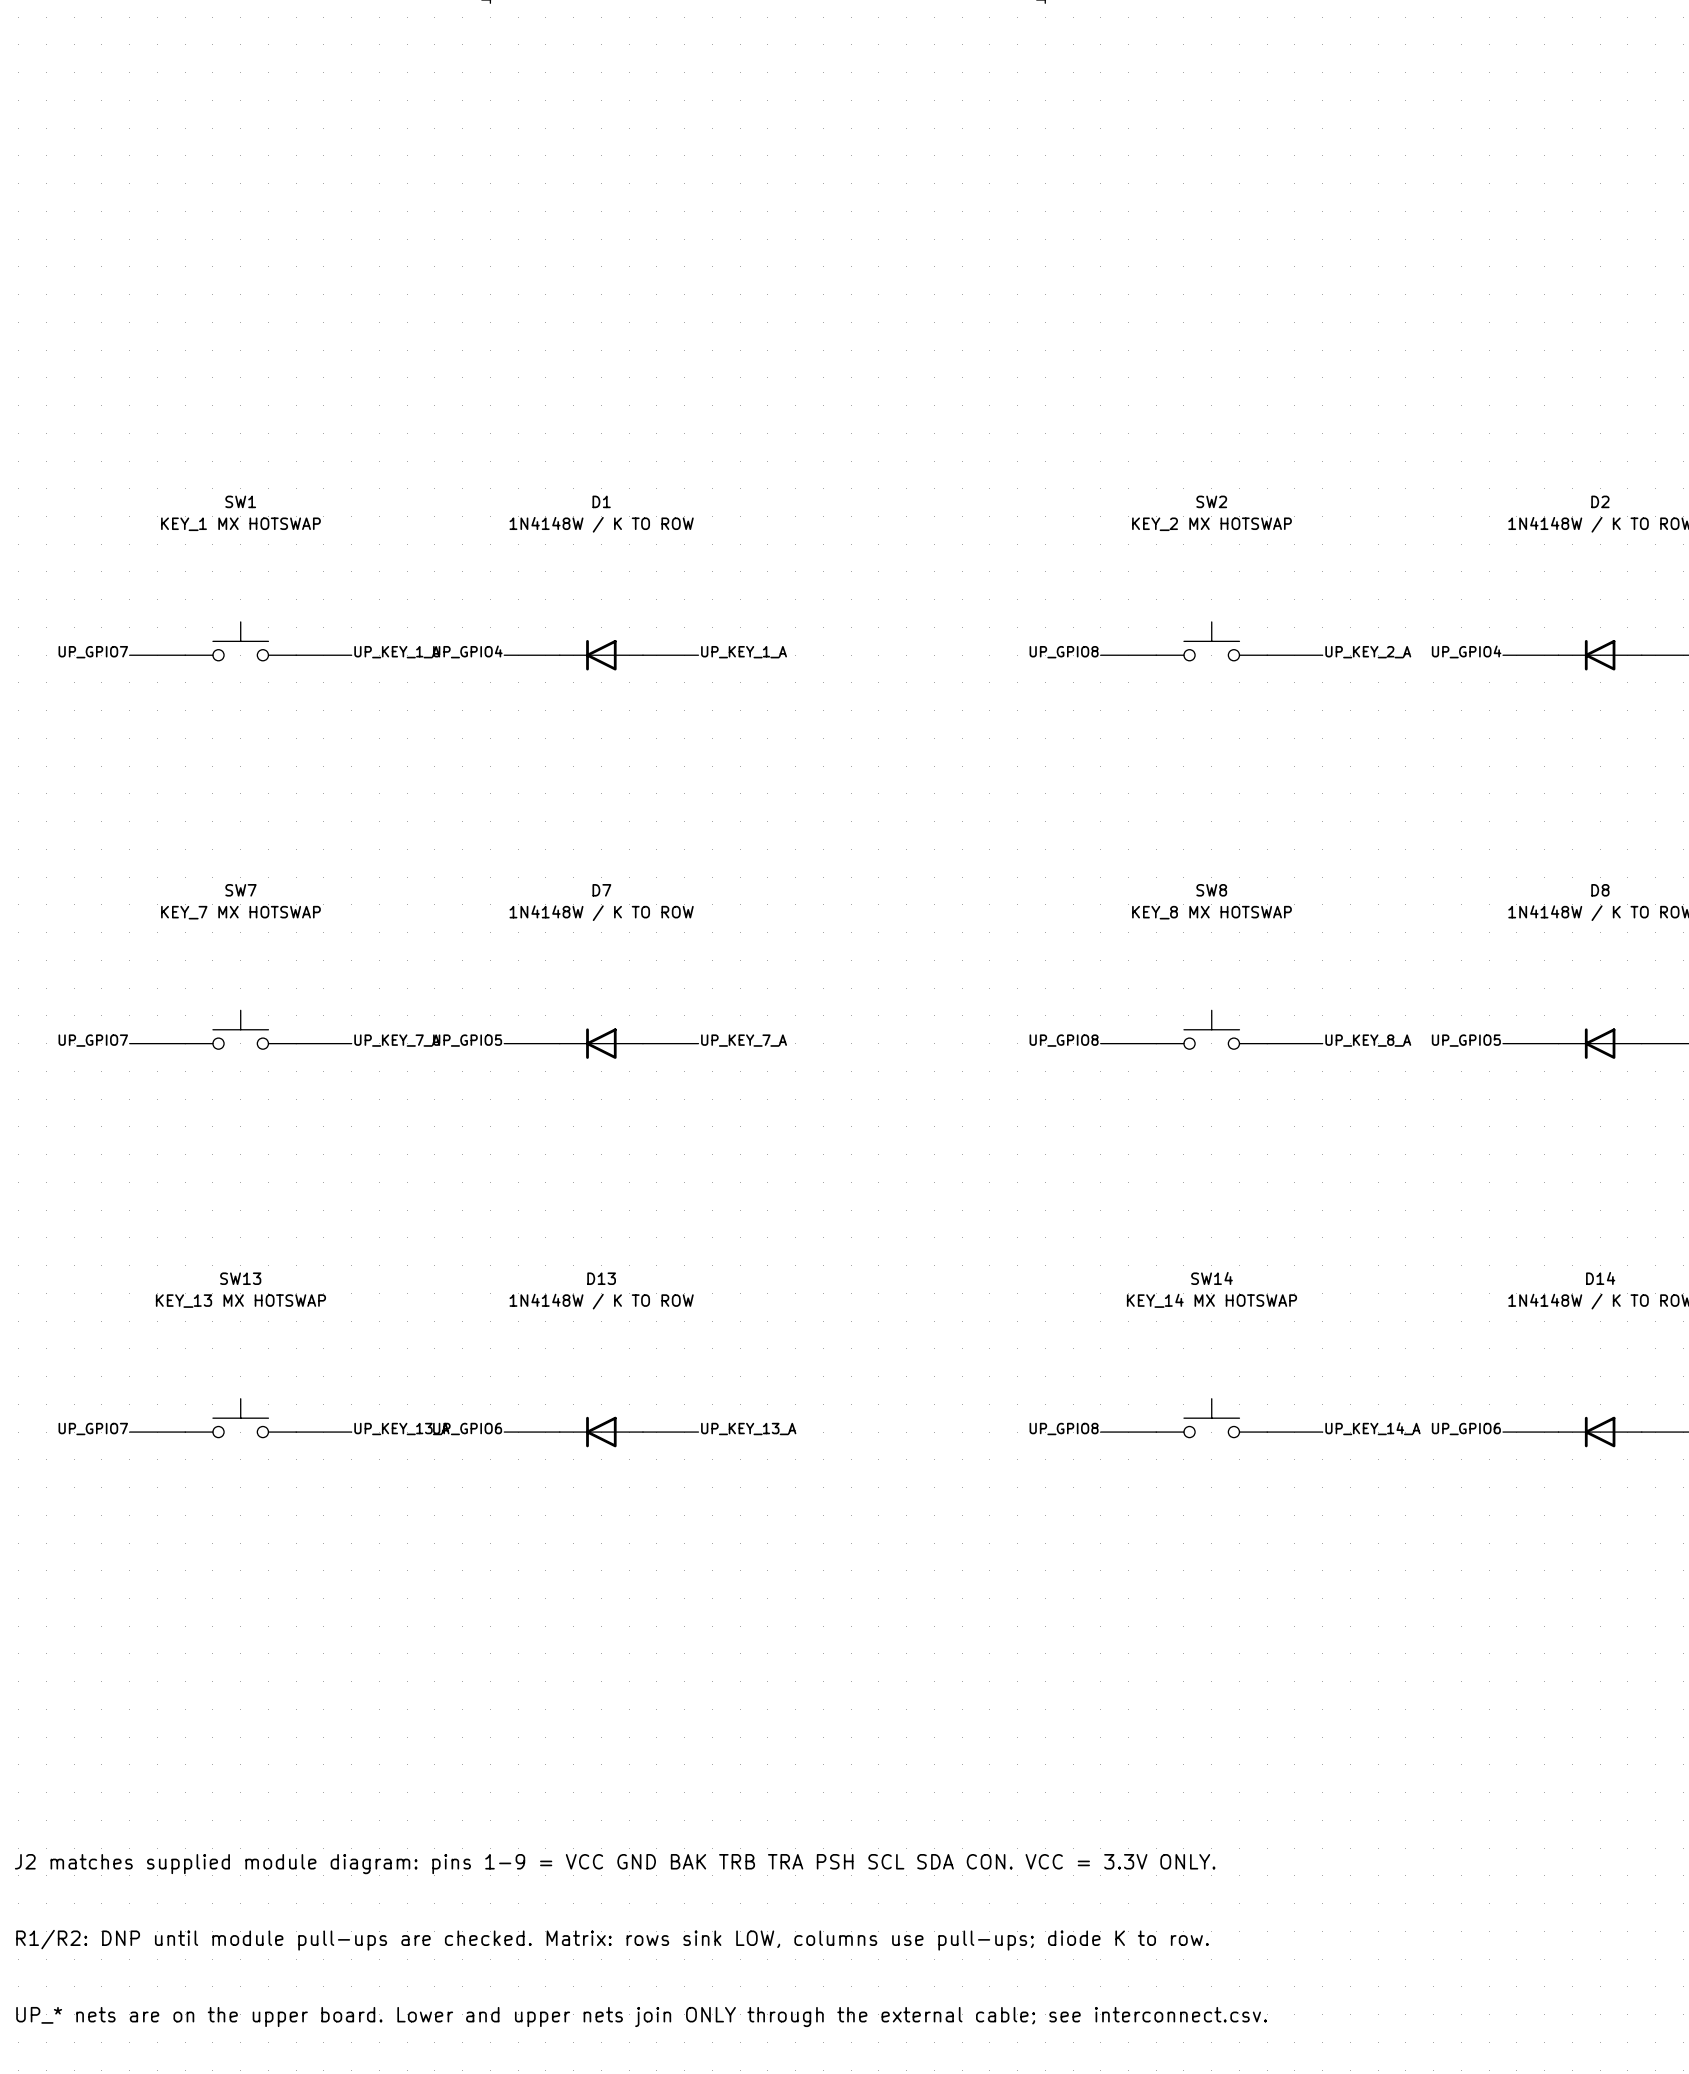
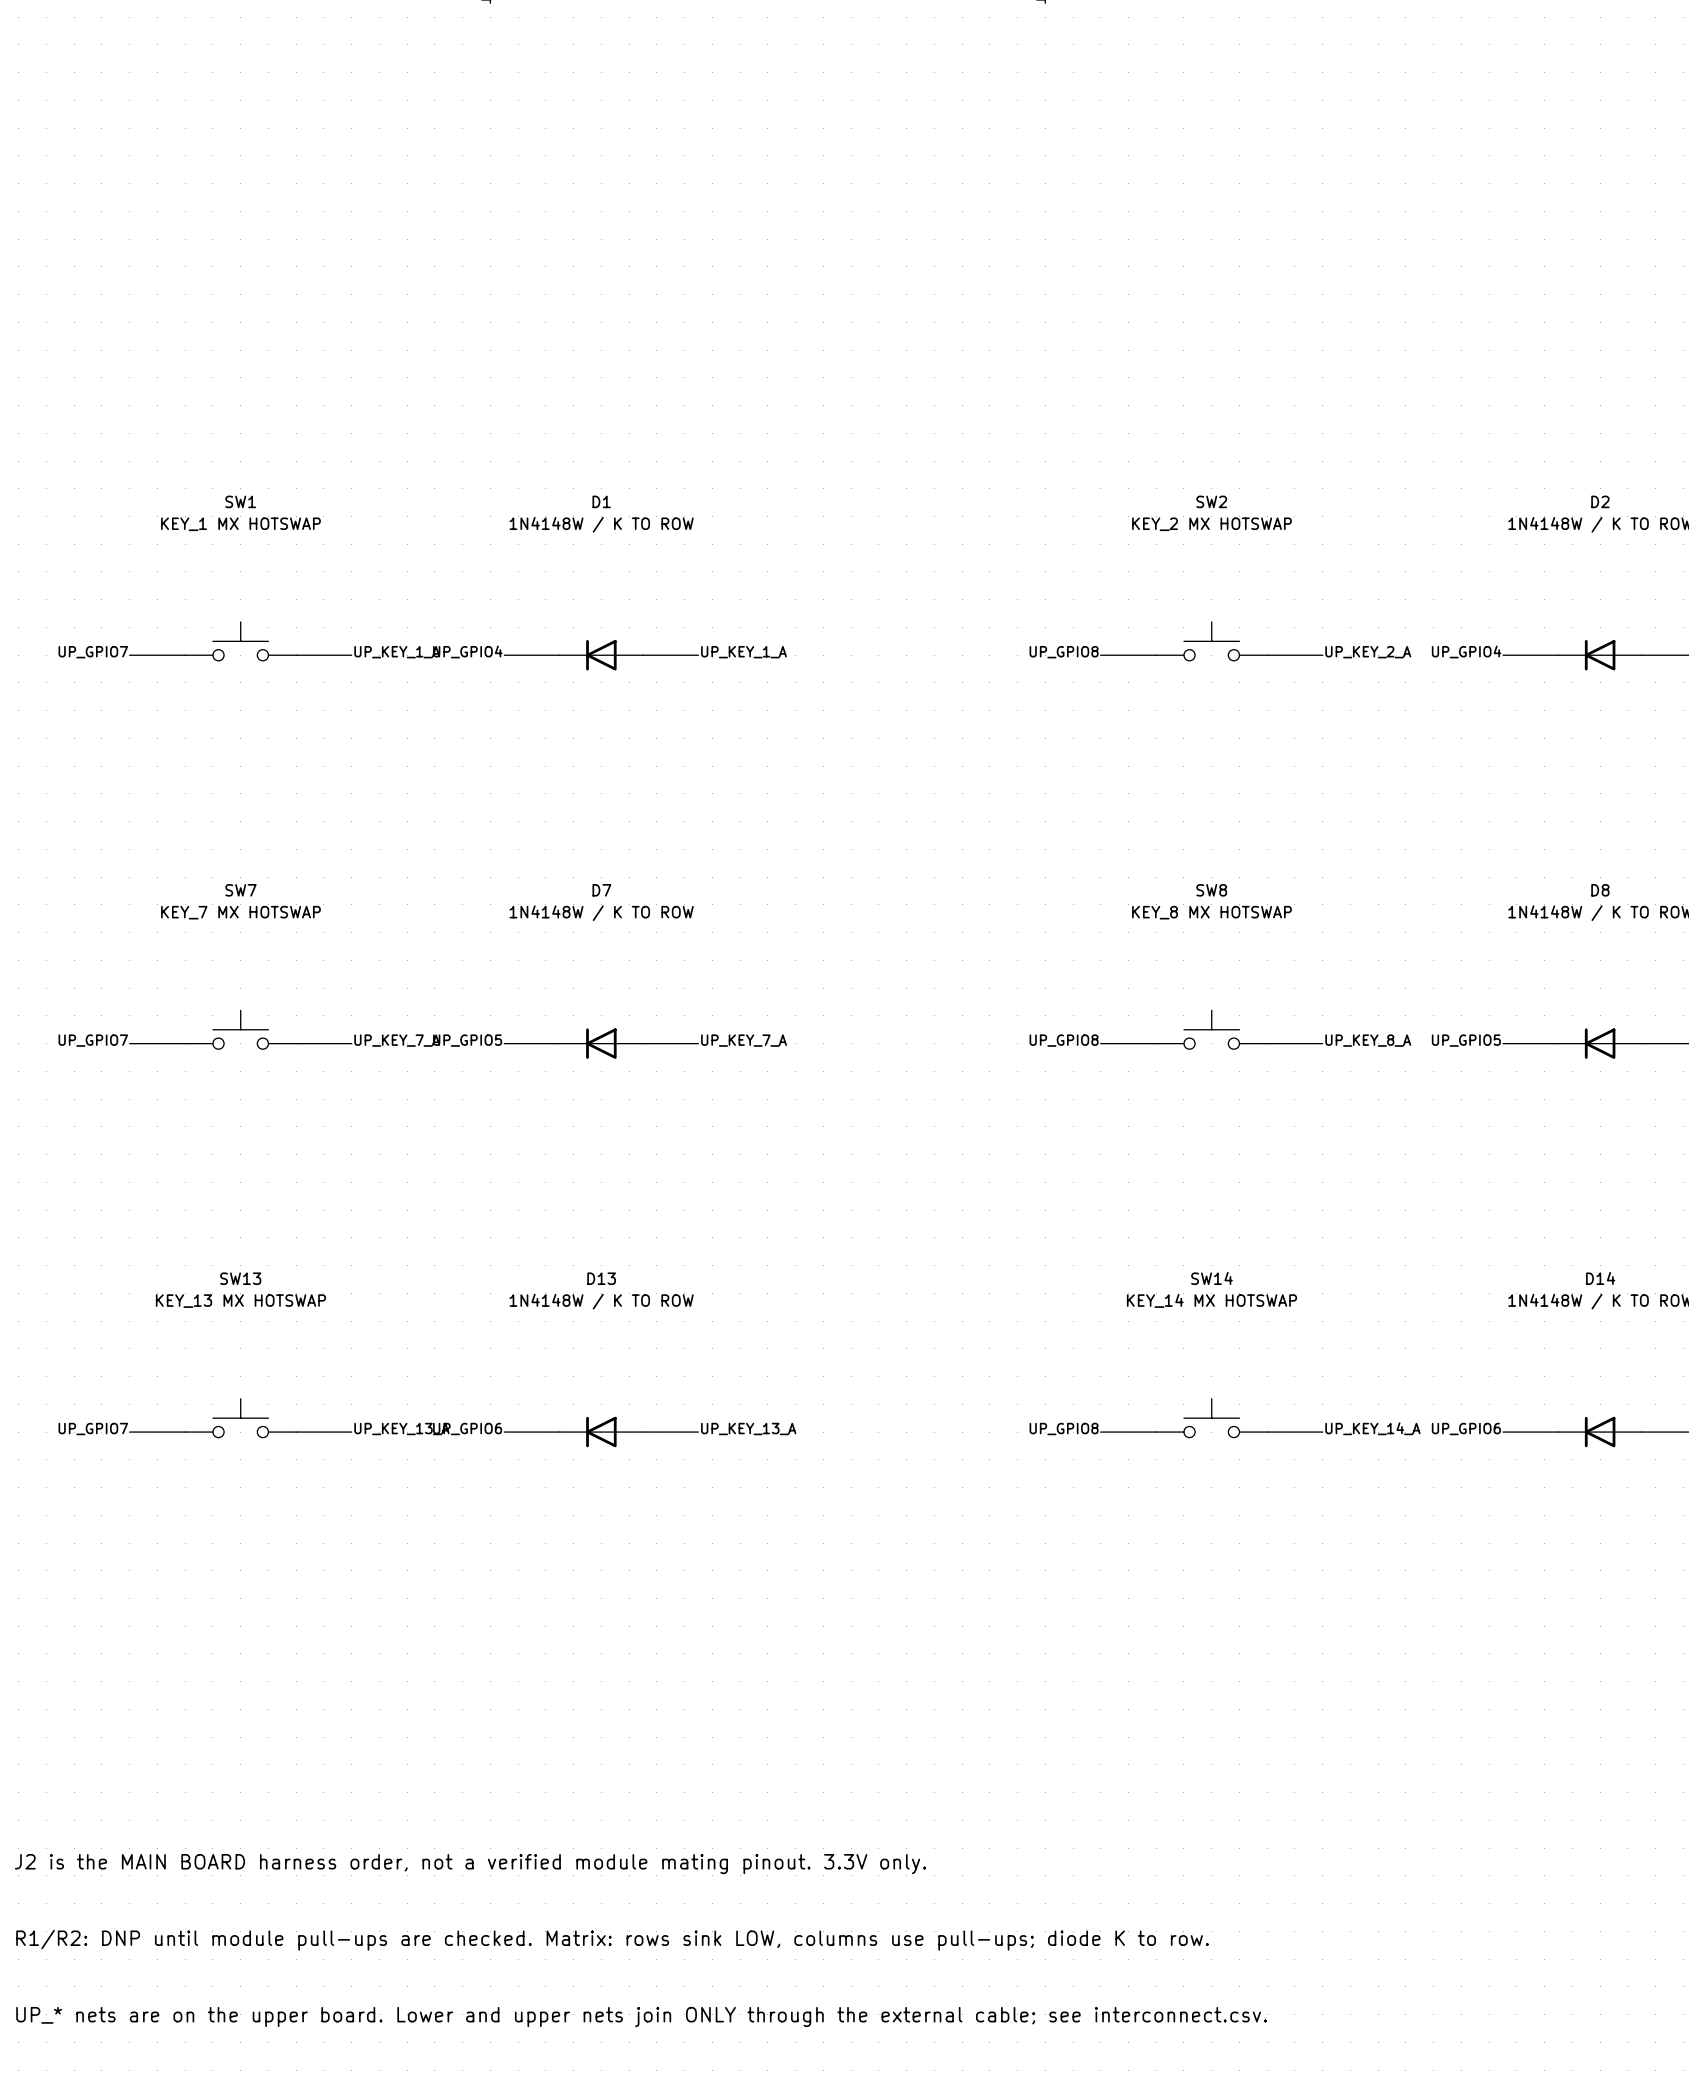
text: J2 matches supplied module diagram: pins 1-9 = VCC GND BAK TRB TRA PSH SCL SDA CON. VCC = 3.3V ONLY. (615, 1864) -> J2 is the MAIN BOARD harness order, not a verified module mating pinout. 3.3V only. (470, 1864)

